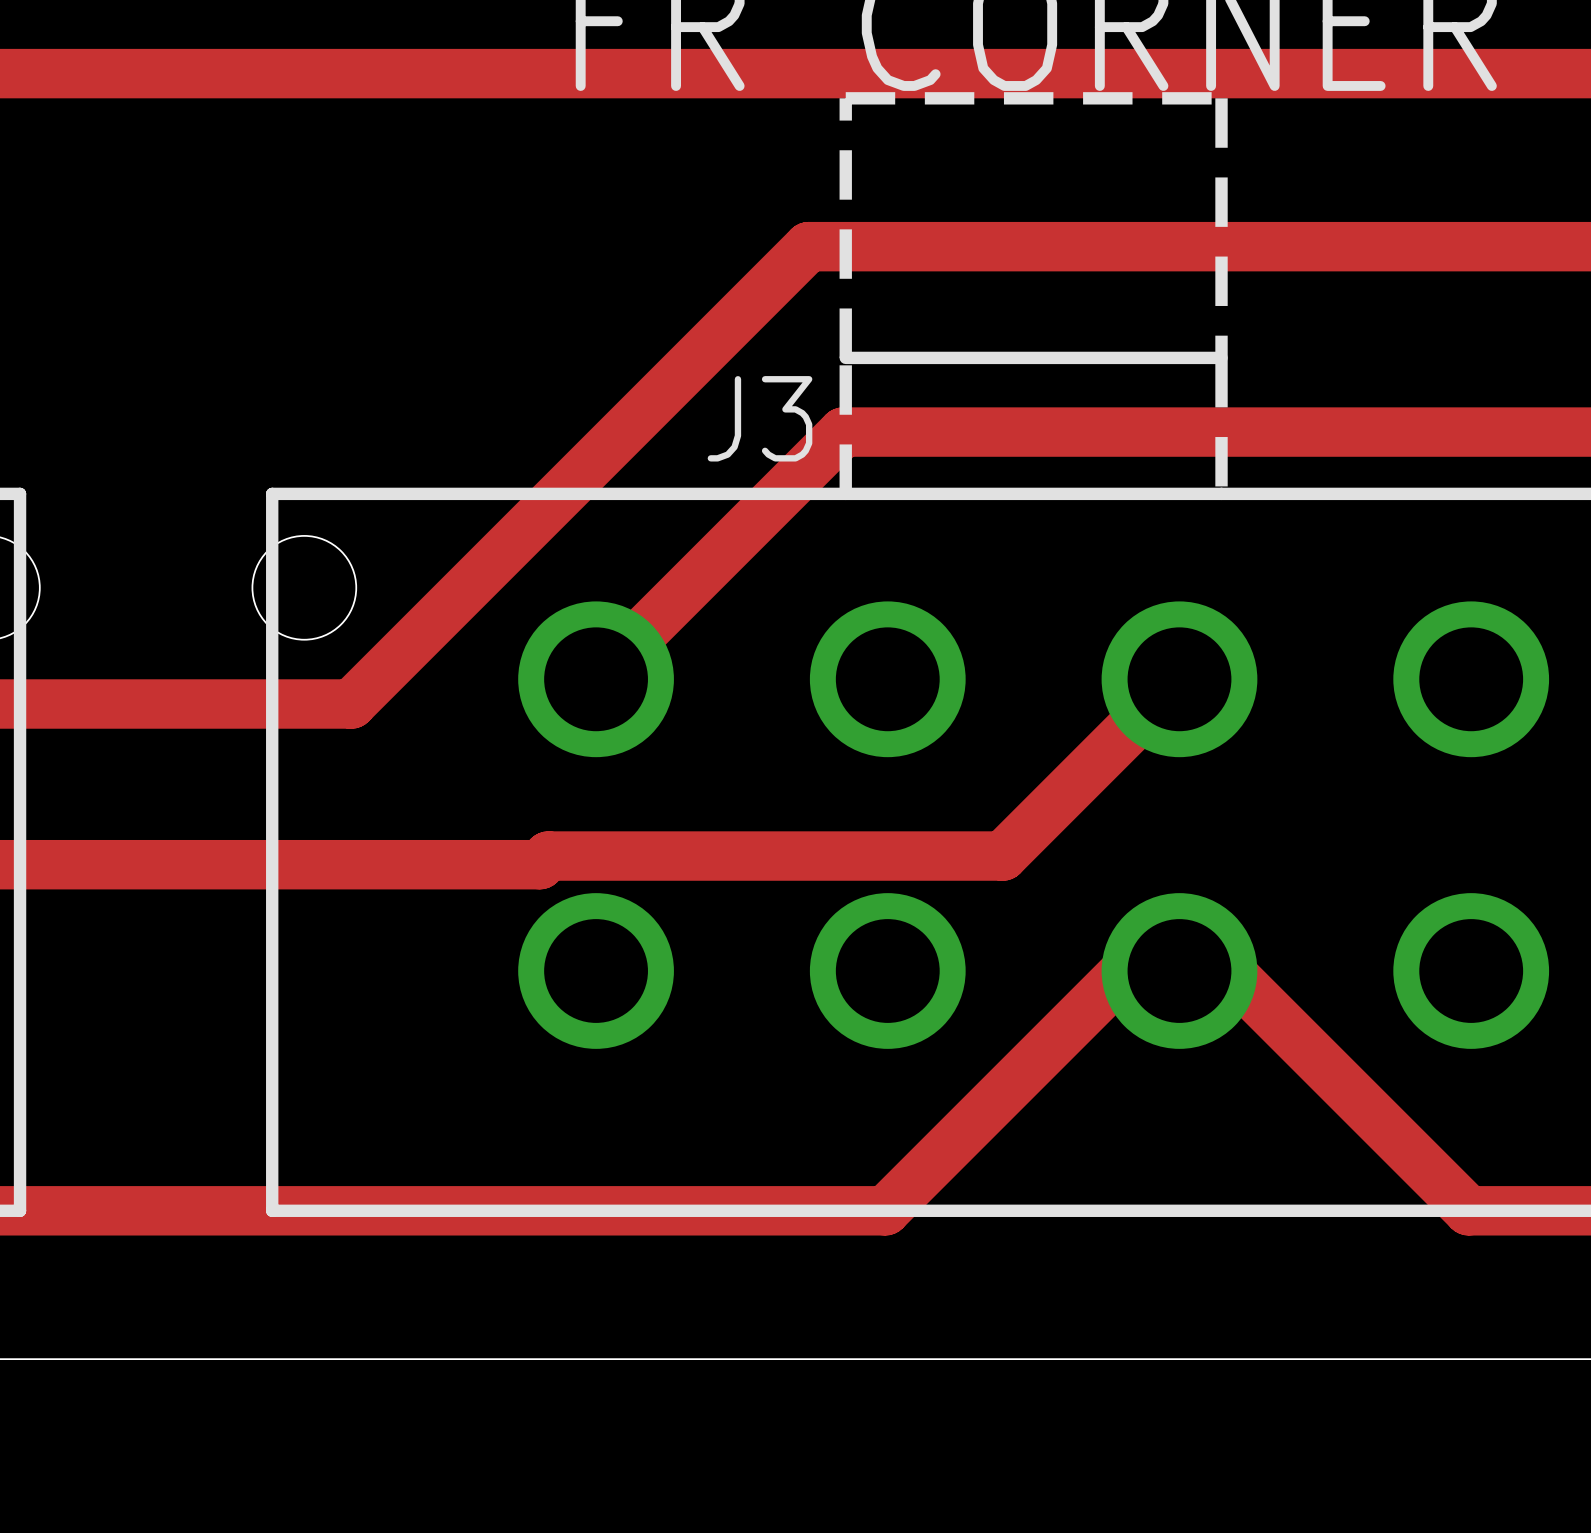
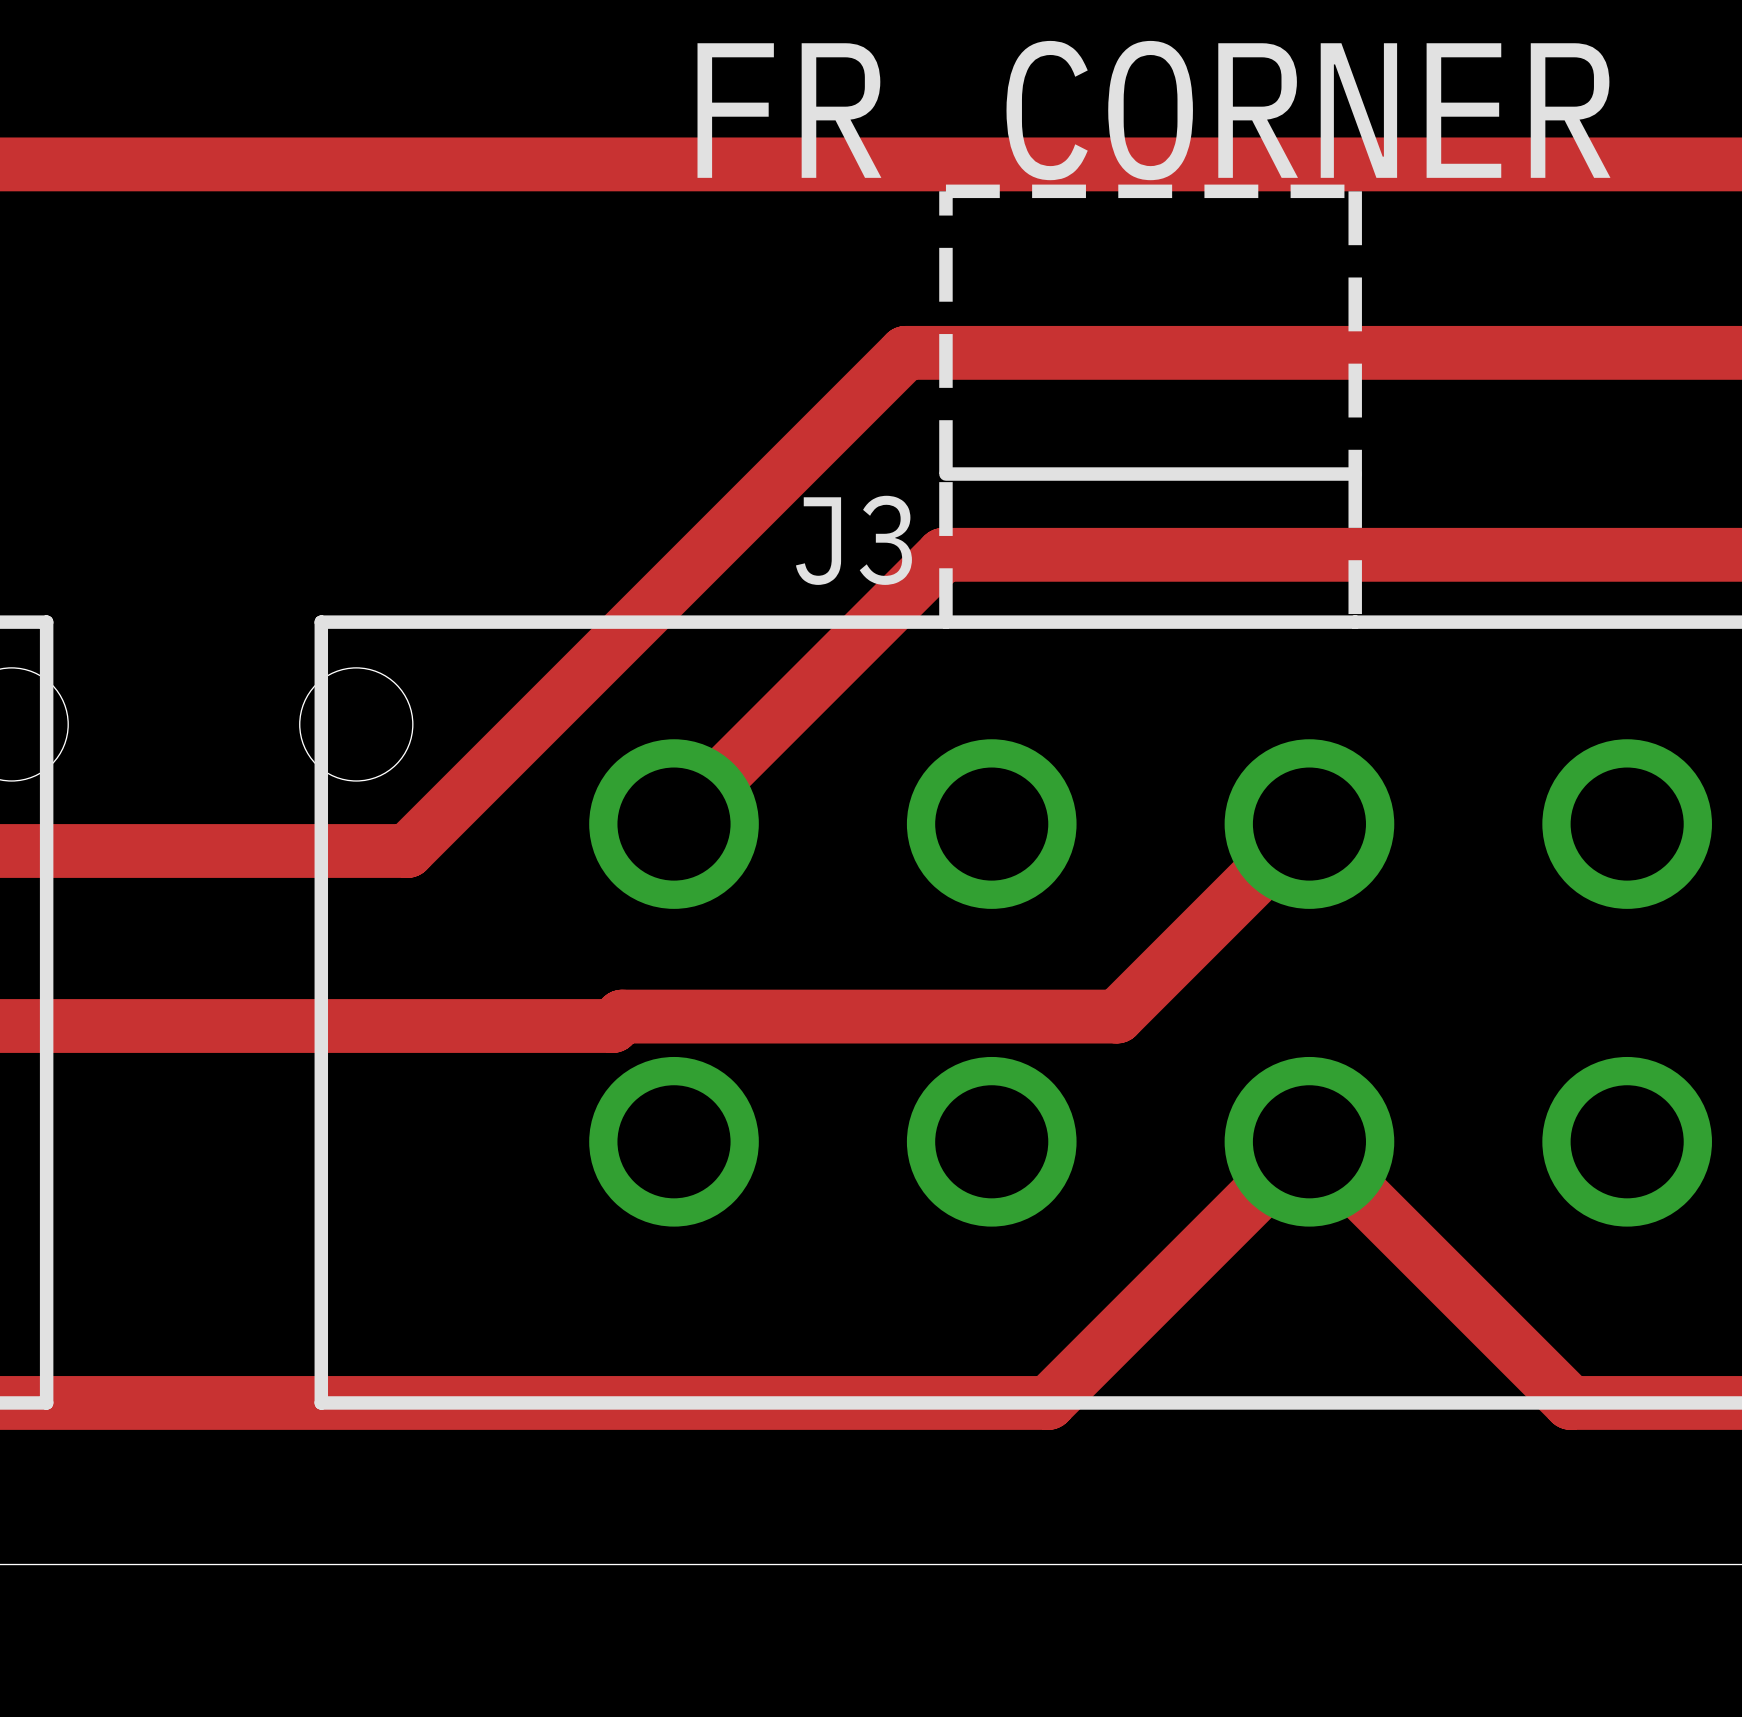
top track: (885, 1210) (1125, 971) (1228, 971) (1468, 1210) -> (989, 1402) (1048, 1402) (1309, 1141) (1570, 1402) (1624, 1402)

